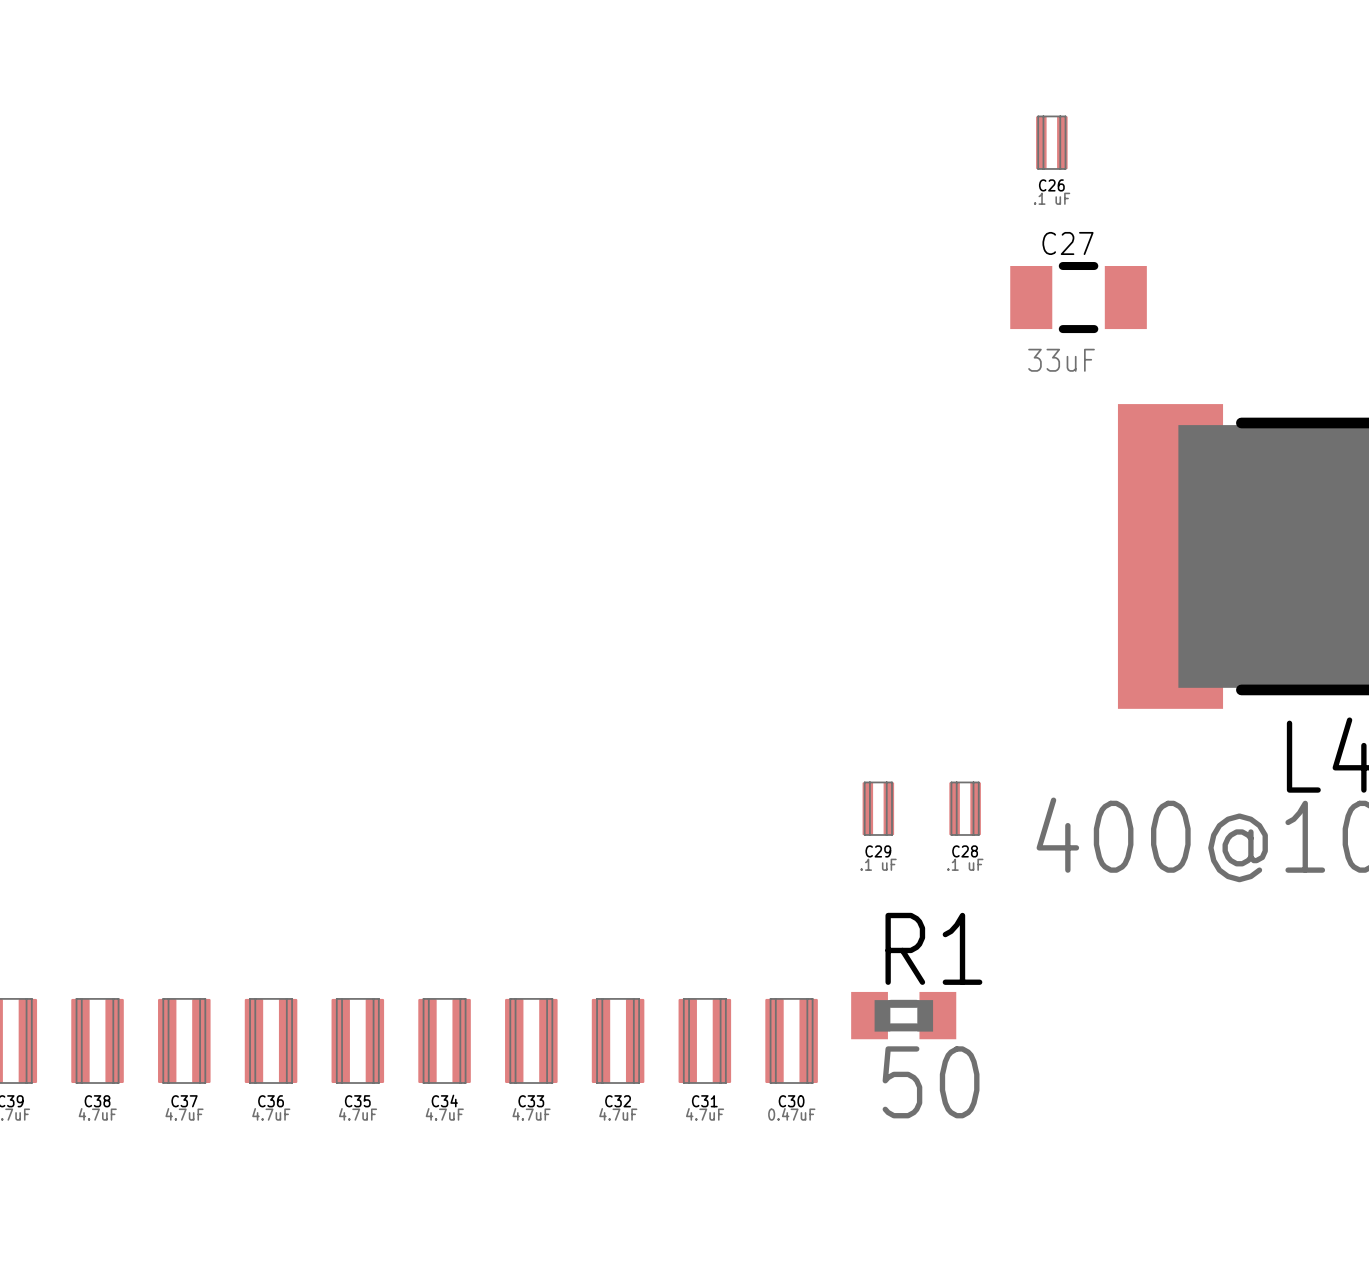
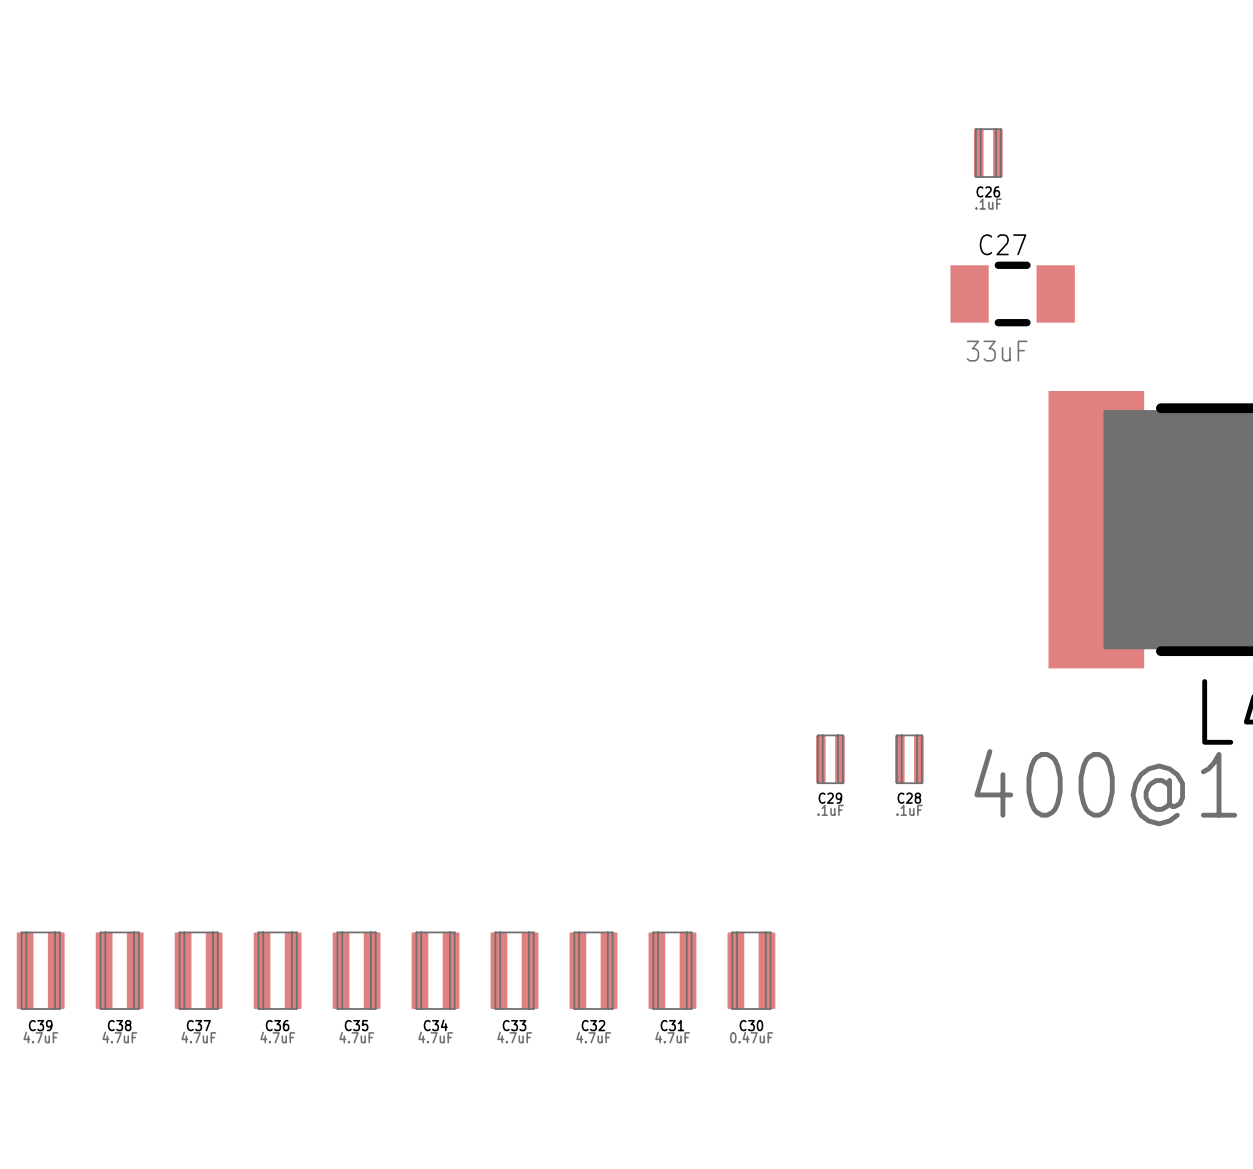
C26 value: .1 uF (1052, 198) -> .1uF (988, 204)
C29 value: .1 uF (878, 864) -> .1uF (830, 810)
C28 value: .1 uF (965, 864) -> .1uF (909, 810)
R1: 50 (903, 1015) -> none

